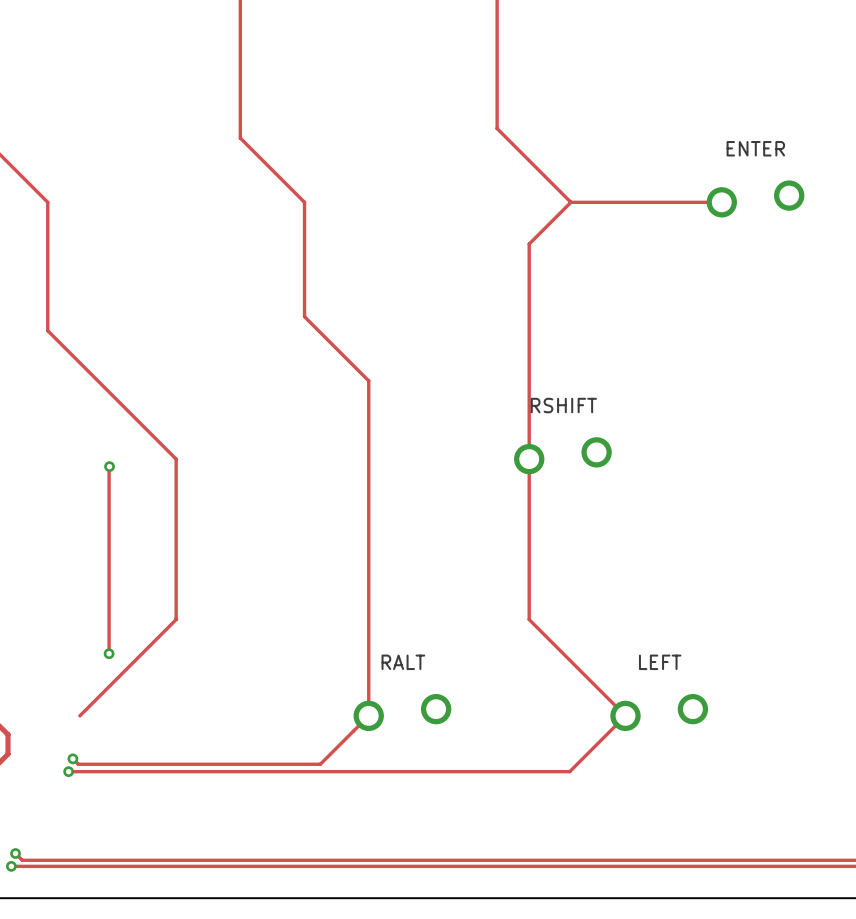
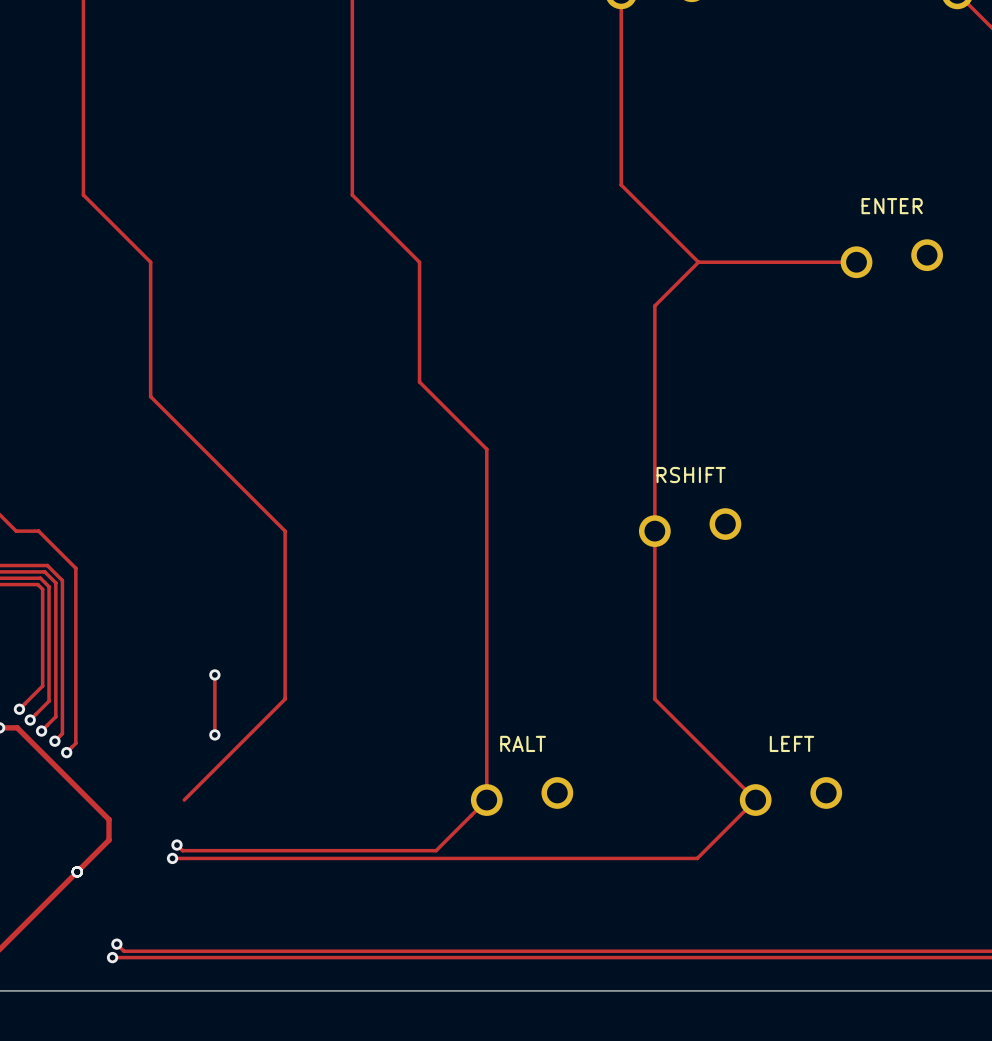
track: (109, 466) (109, 596) -> none
via: (109, 466) -> none
via: none -> (214, 674)

